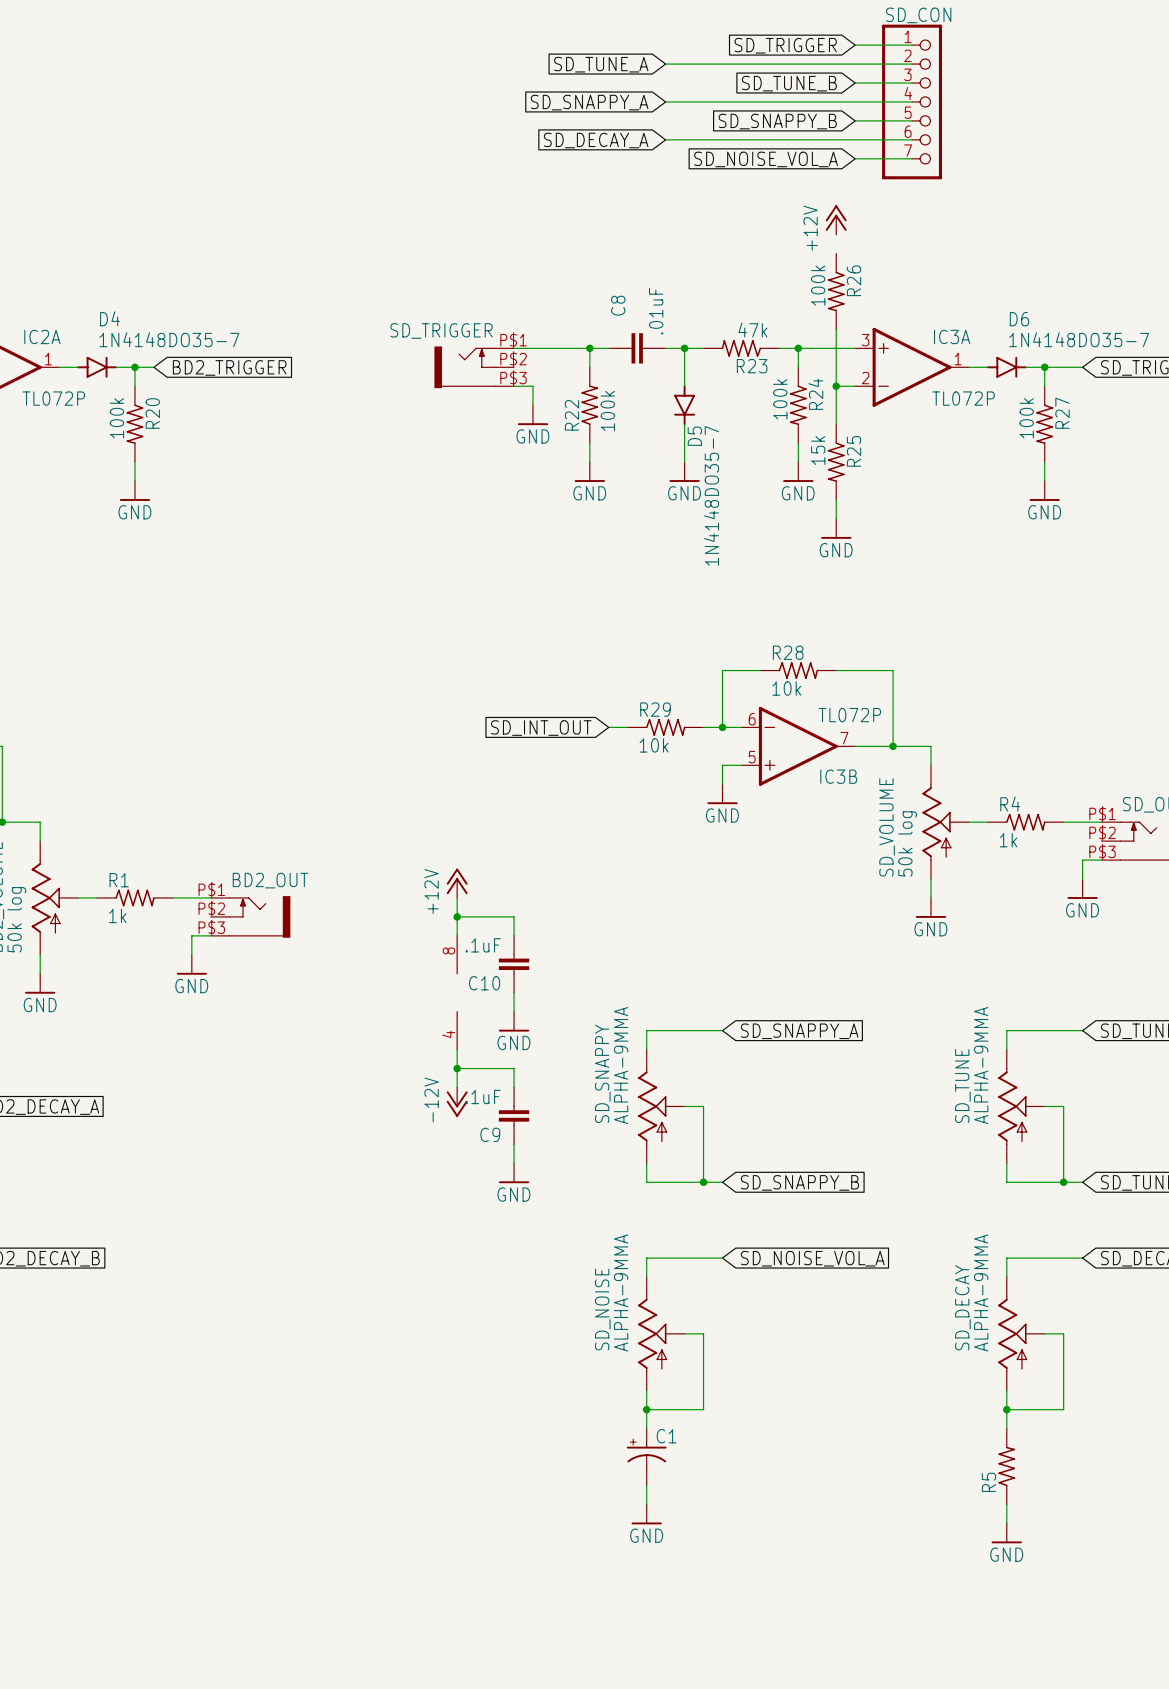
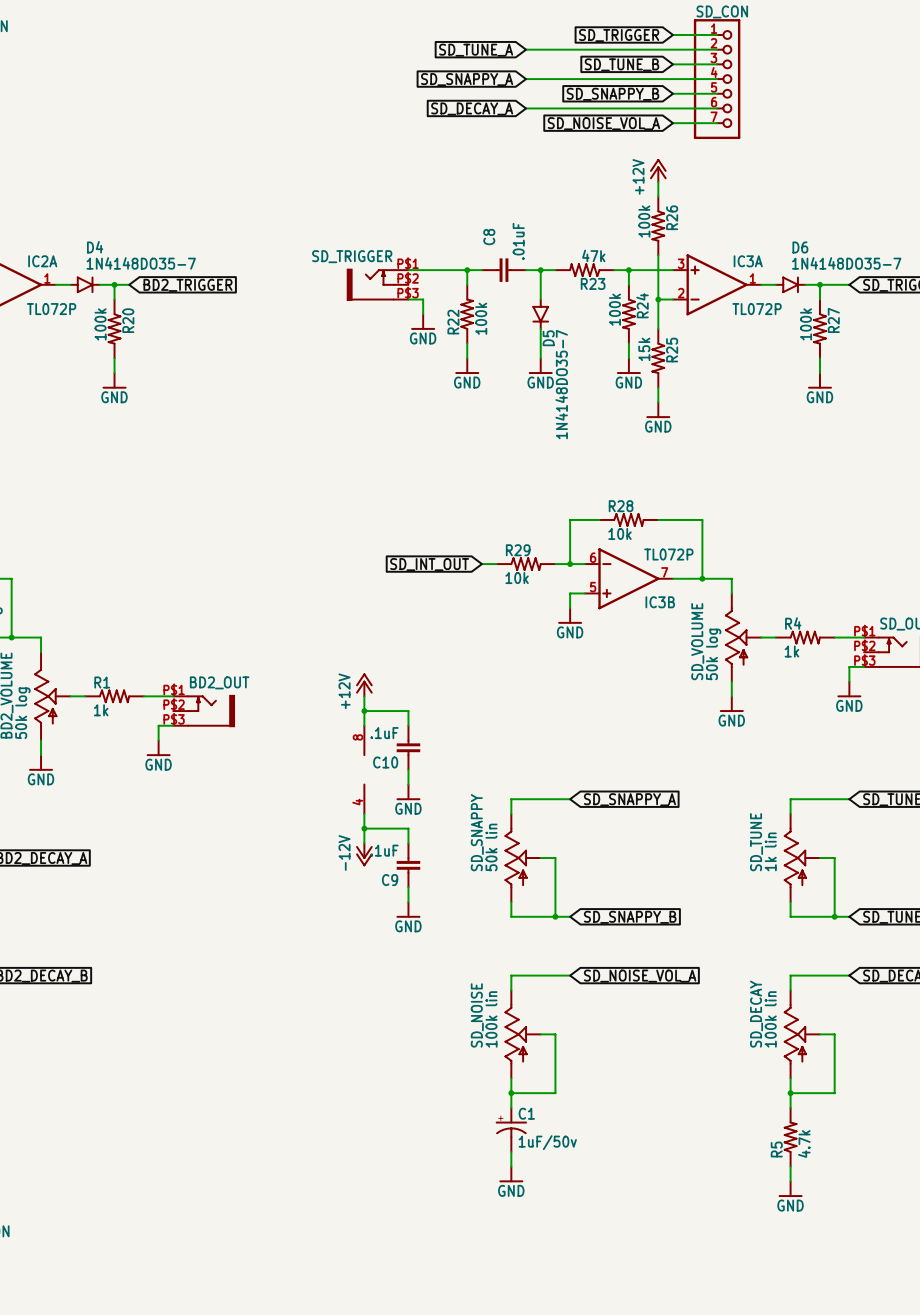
wire: none -> (658, 181) (658, 196)
SD_SNAPPY value: ALPHA-9MMA (621, 1065) -> 50k lin (491, 847)
SD_TUNE value: ALPHA-9MMA (981, 1065) -> 1k lin (770, 851)
SD_NOISE value: ALPHA-9MMA (621, 1293) -> 100k lin (491, 1019)
SD_DECAY value: ALPHA-9MMA (981, 1293) -> 100k lin (770, 1019)
C1 value: none -> 1uF/50v (547, 1142)
R5 value: none -> 4.7k (804, 1143)

